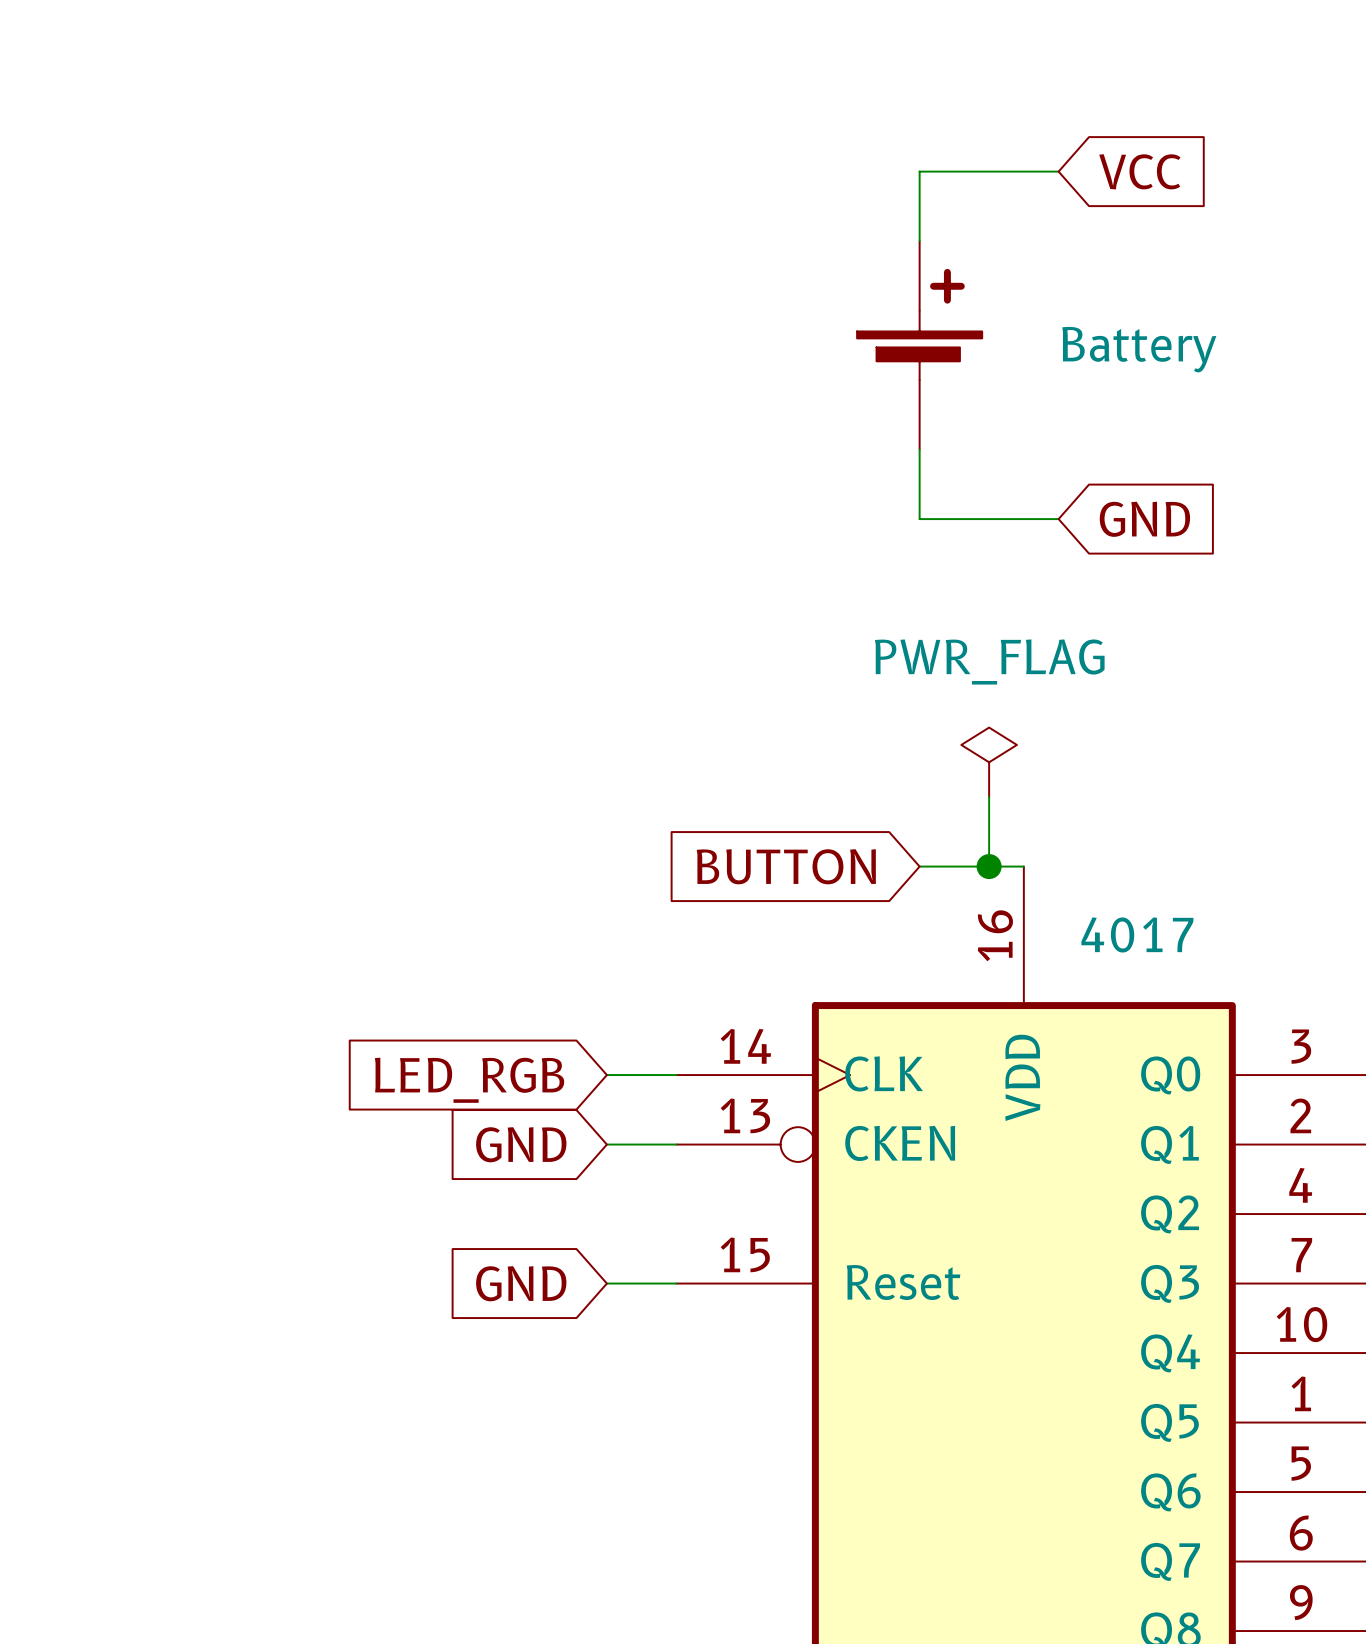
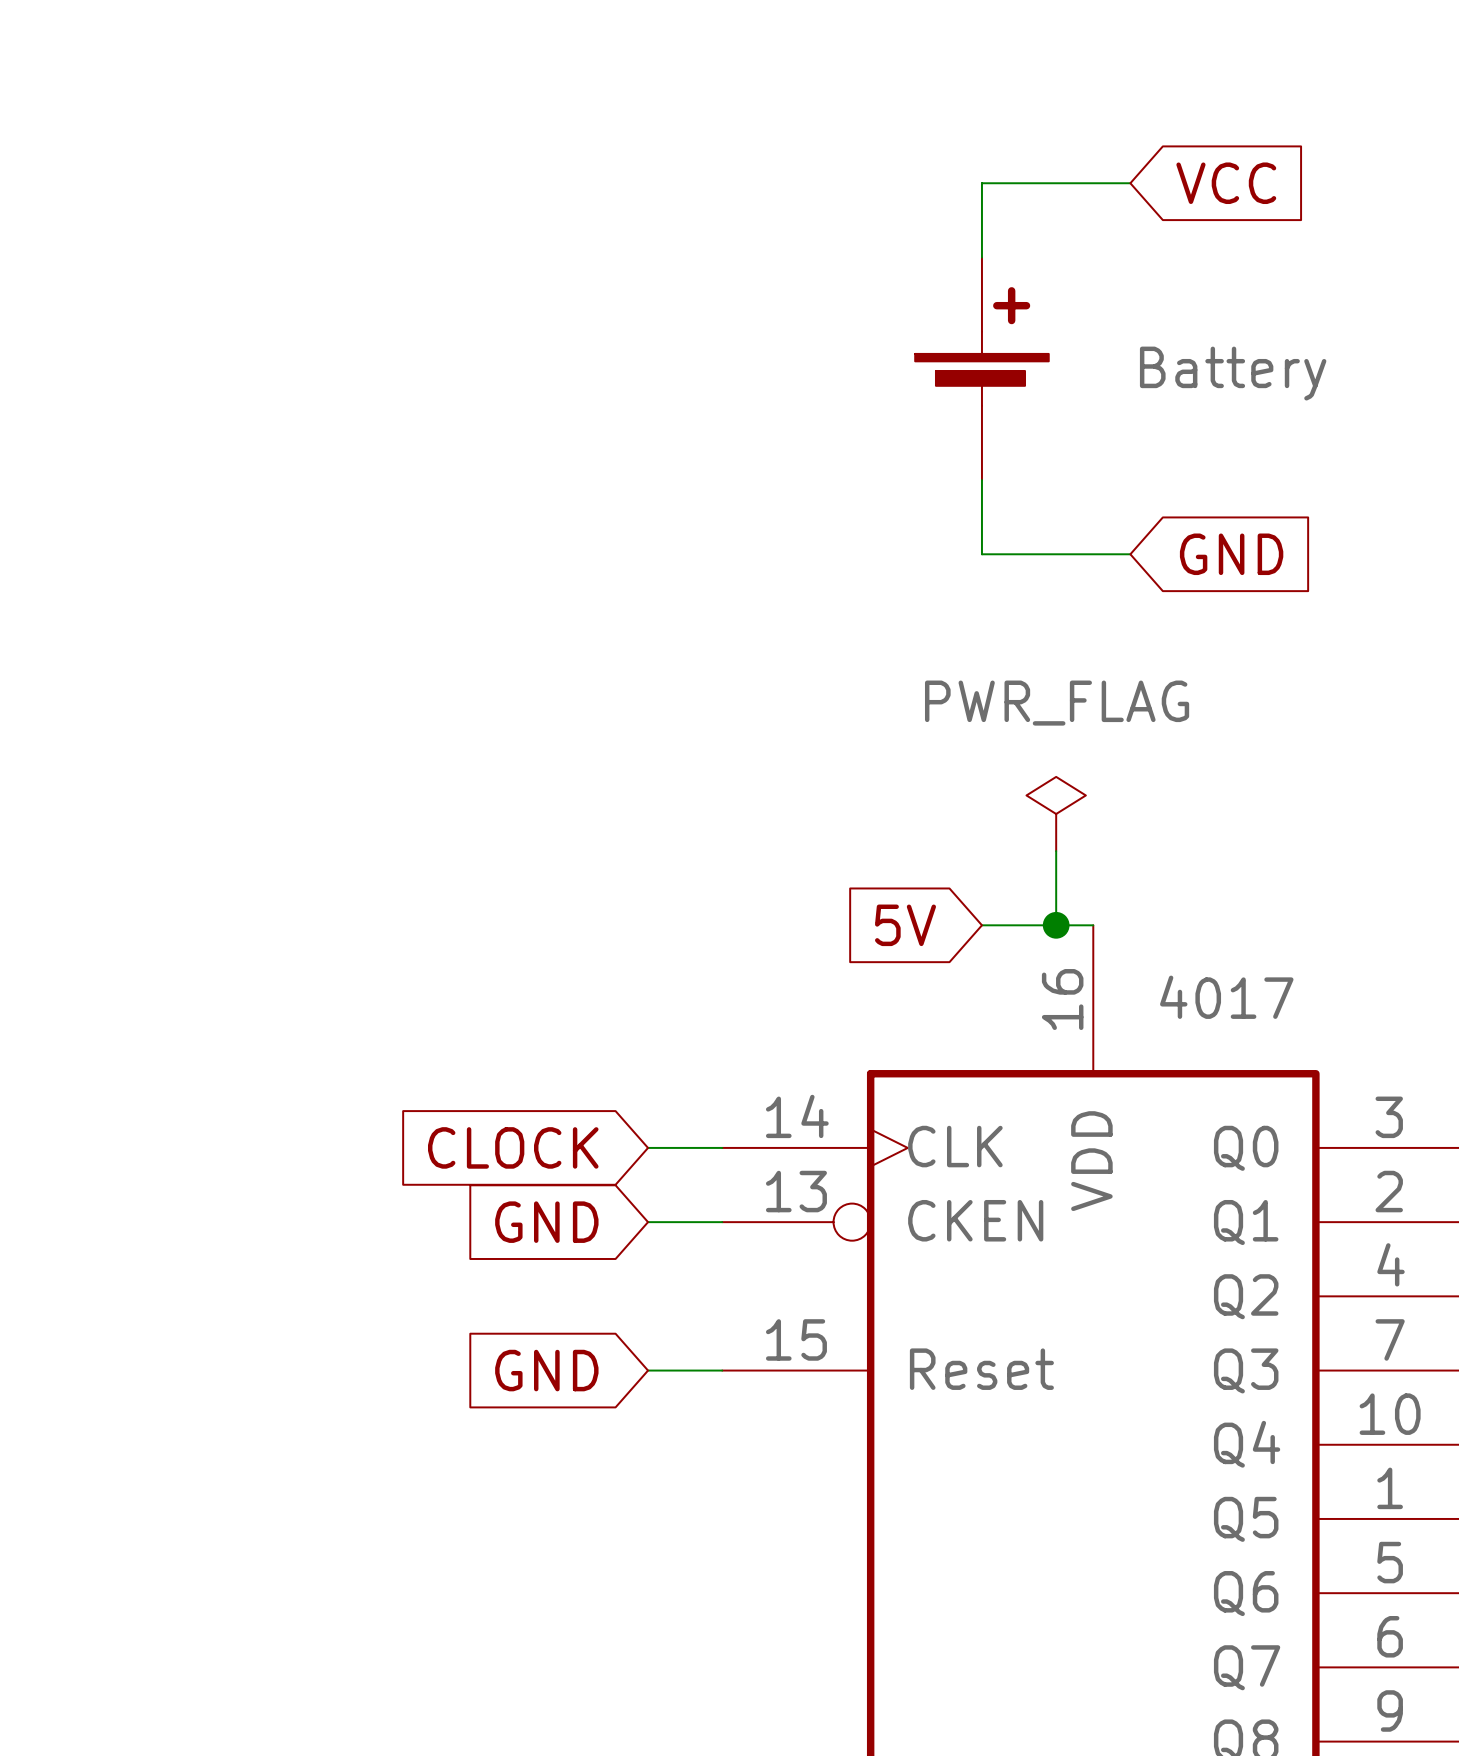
global label: BUTTON (786, 866) -> 5V (905, 925)
global label: LED_RGB (469, 1080) -> CLOCK (513, 1147)

